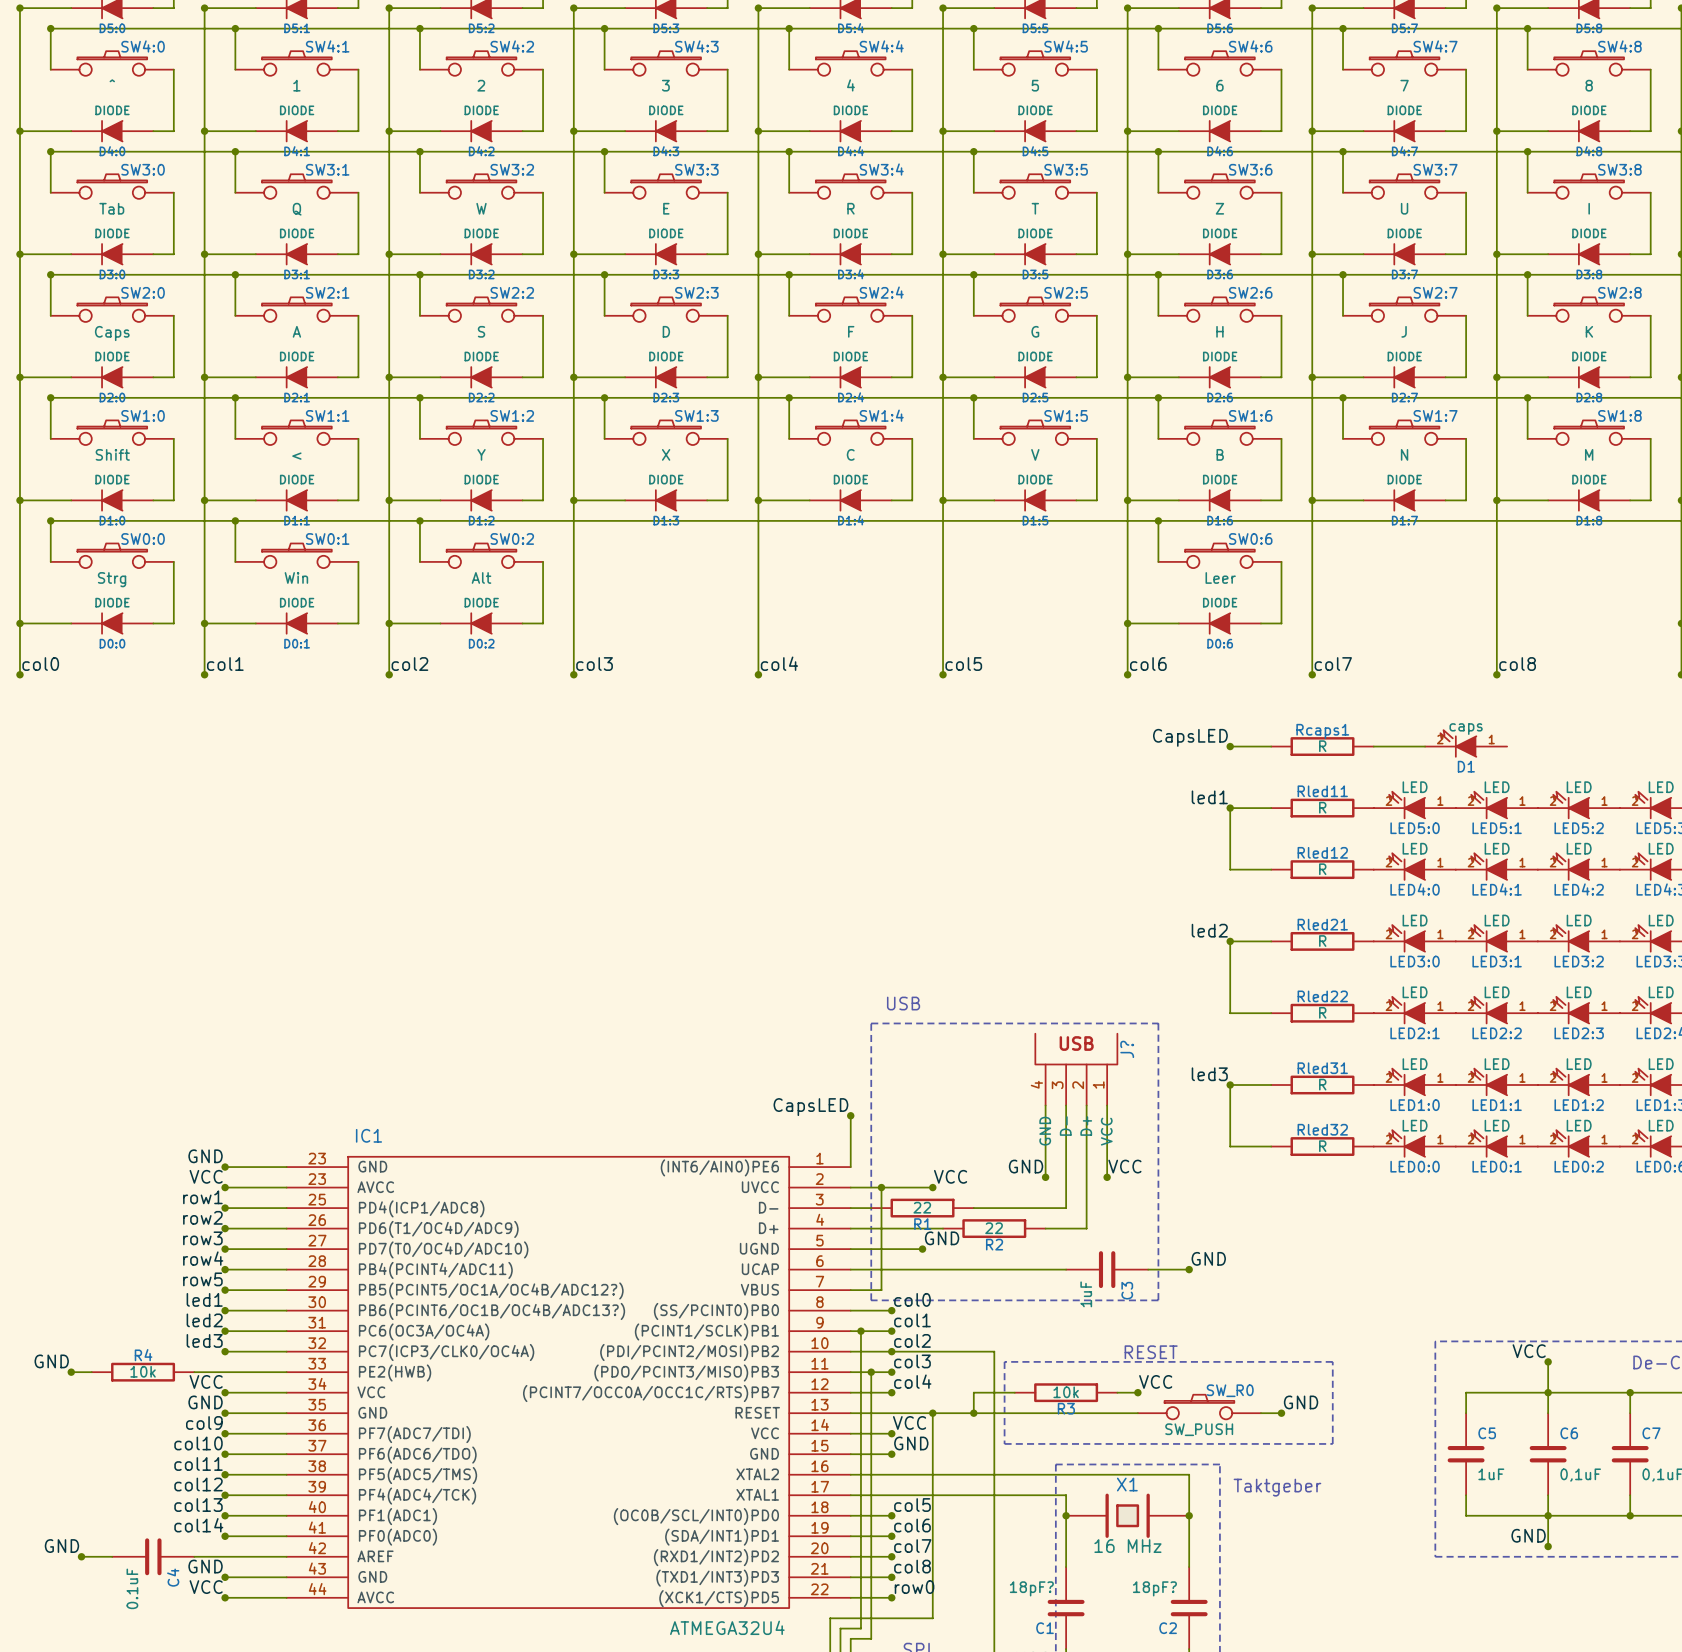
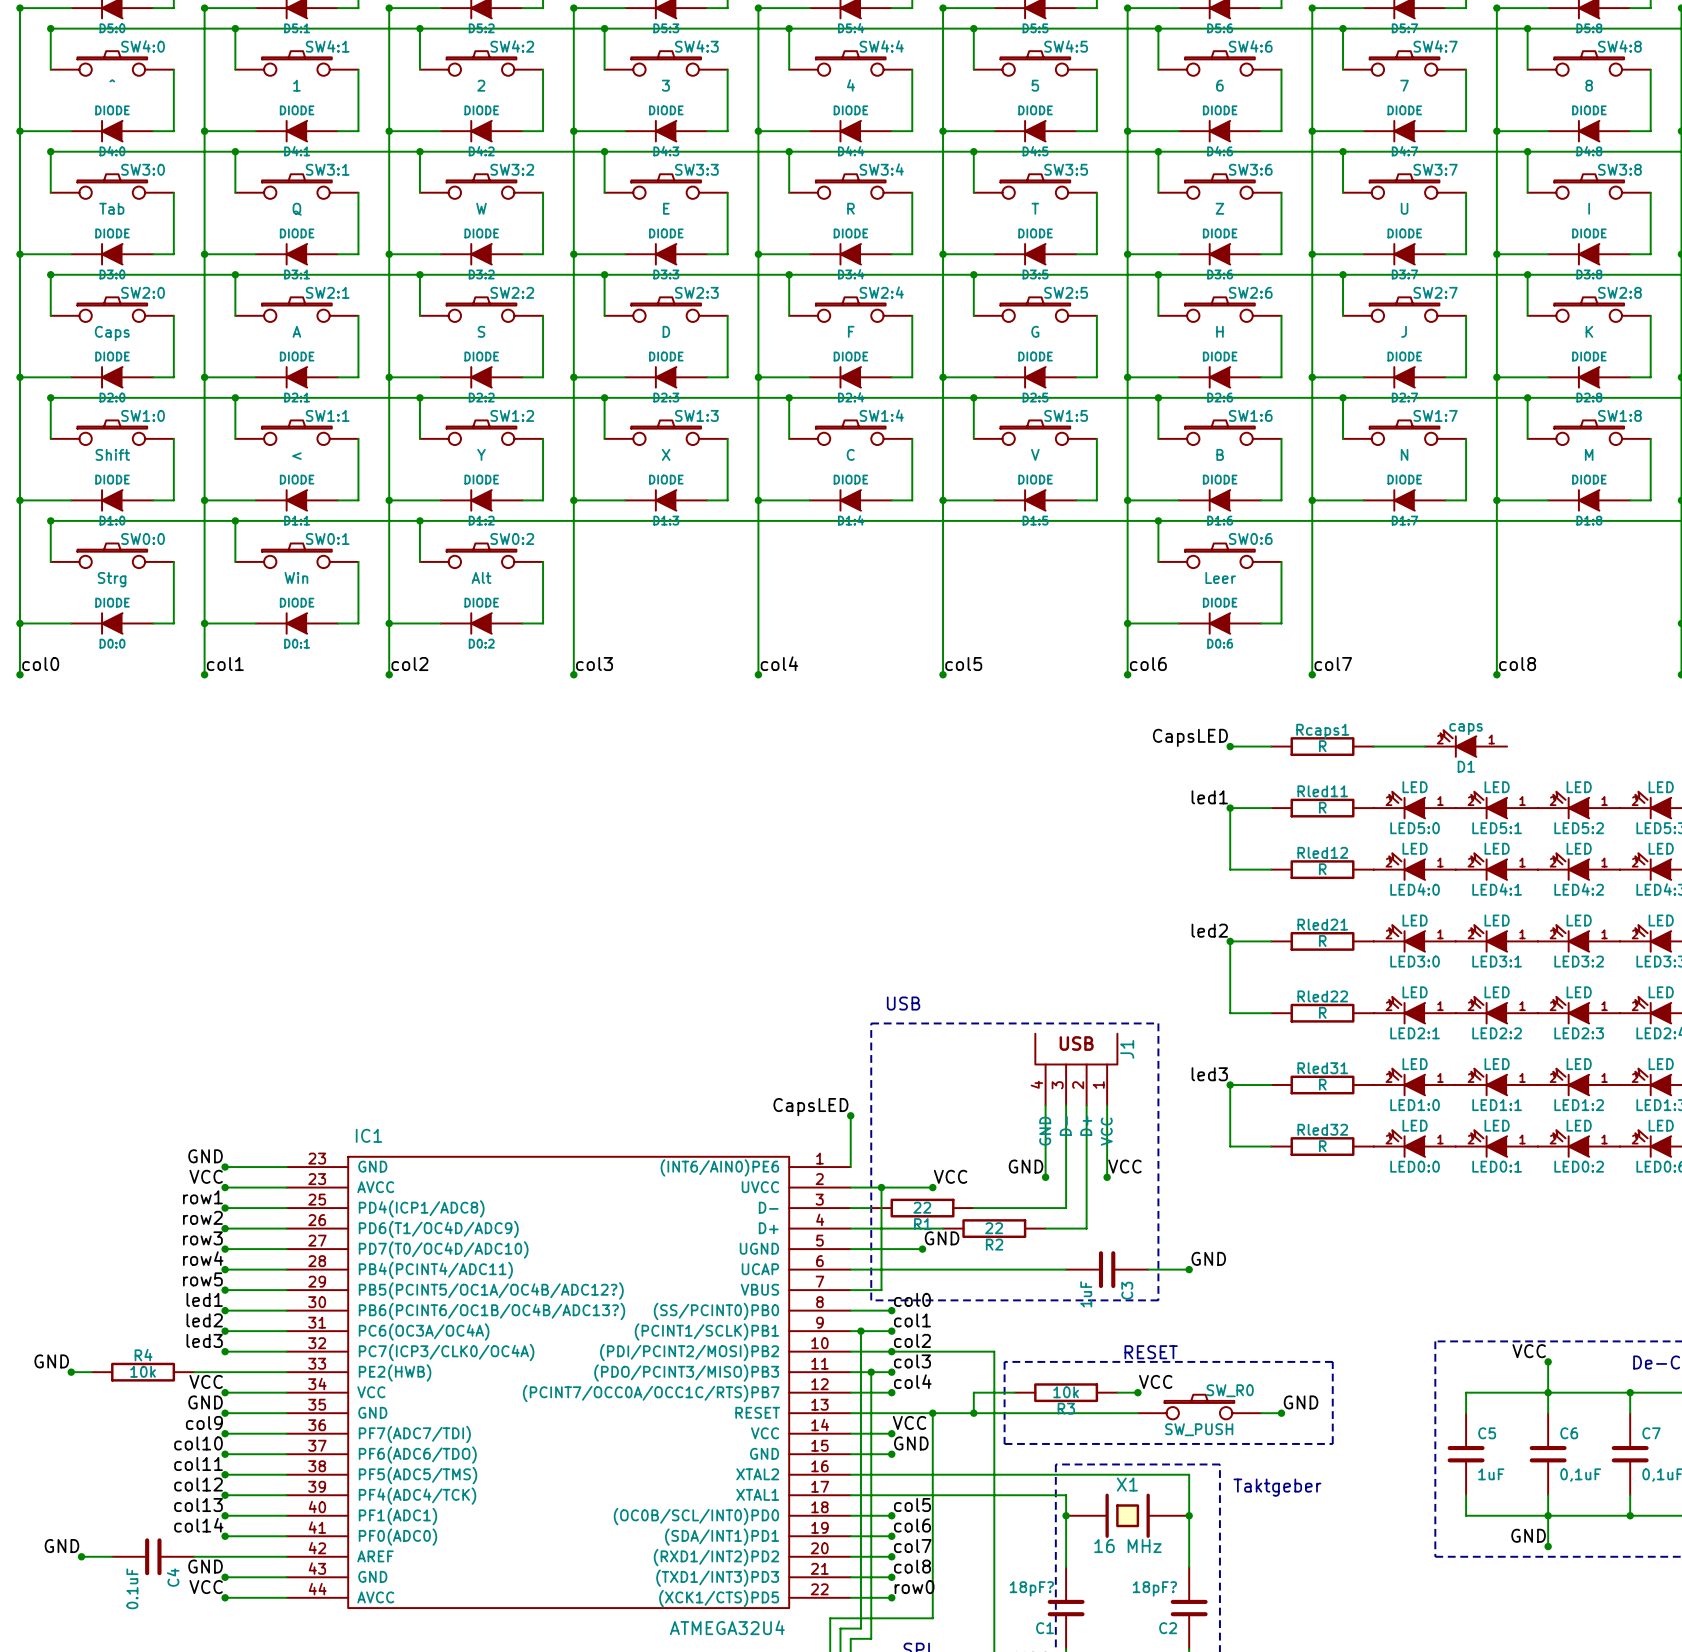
J? name: J? (1127, 1049) -> J1 (1127, 1049)

